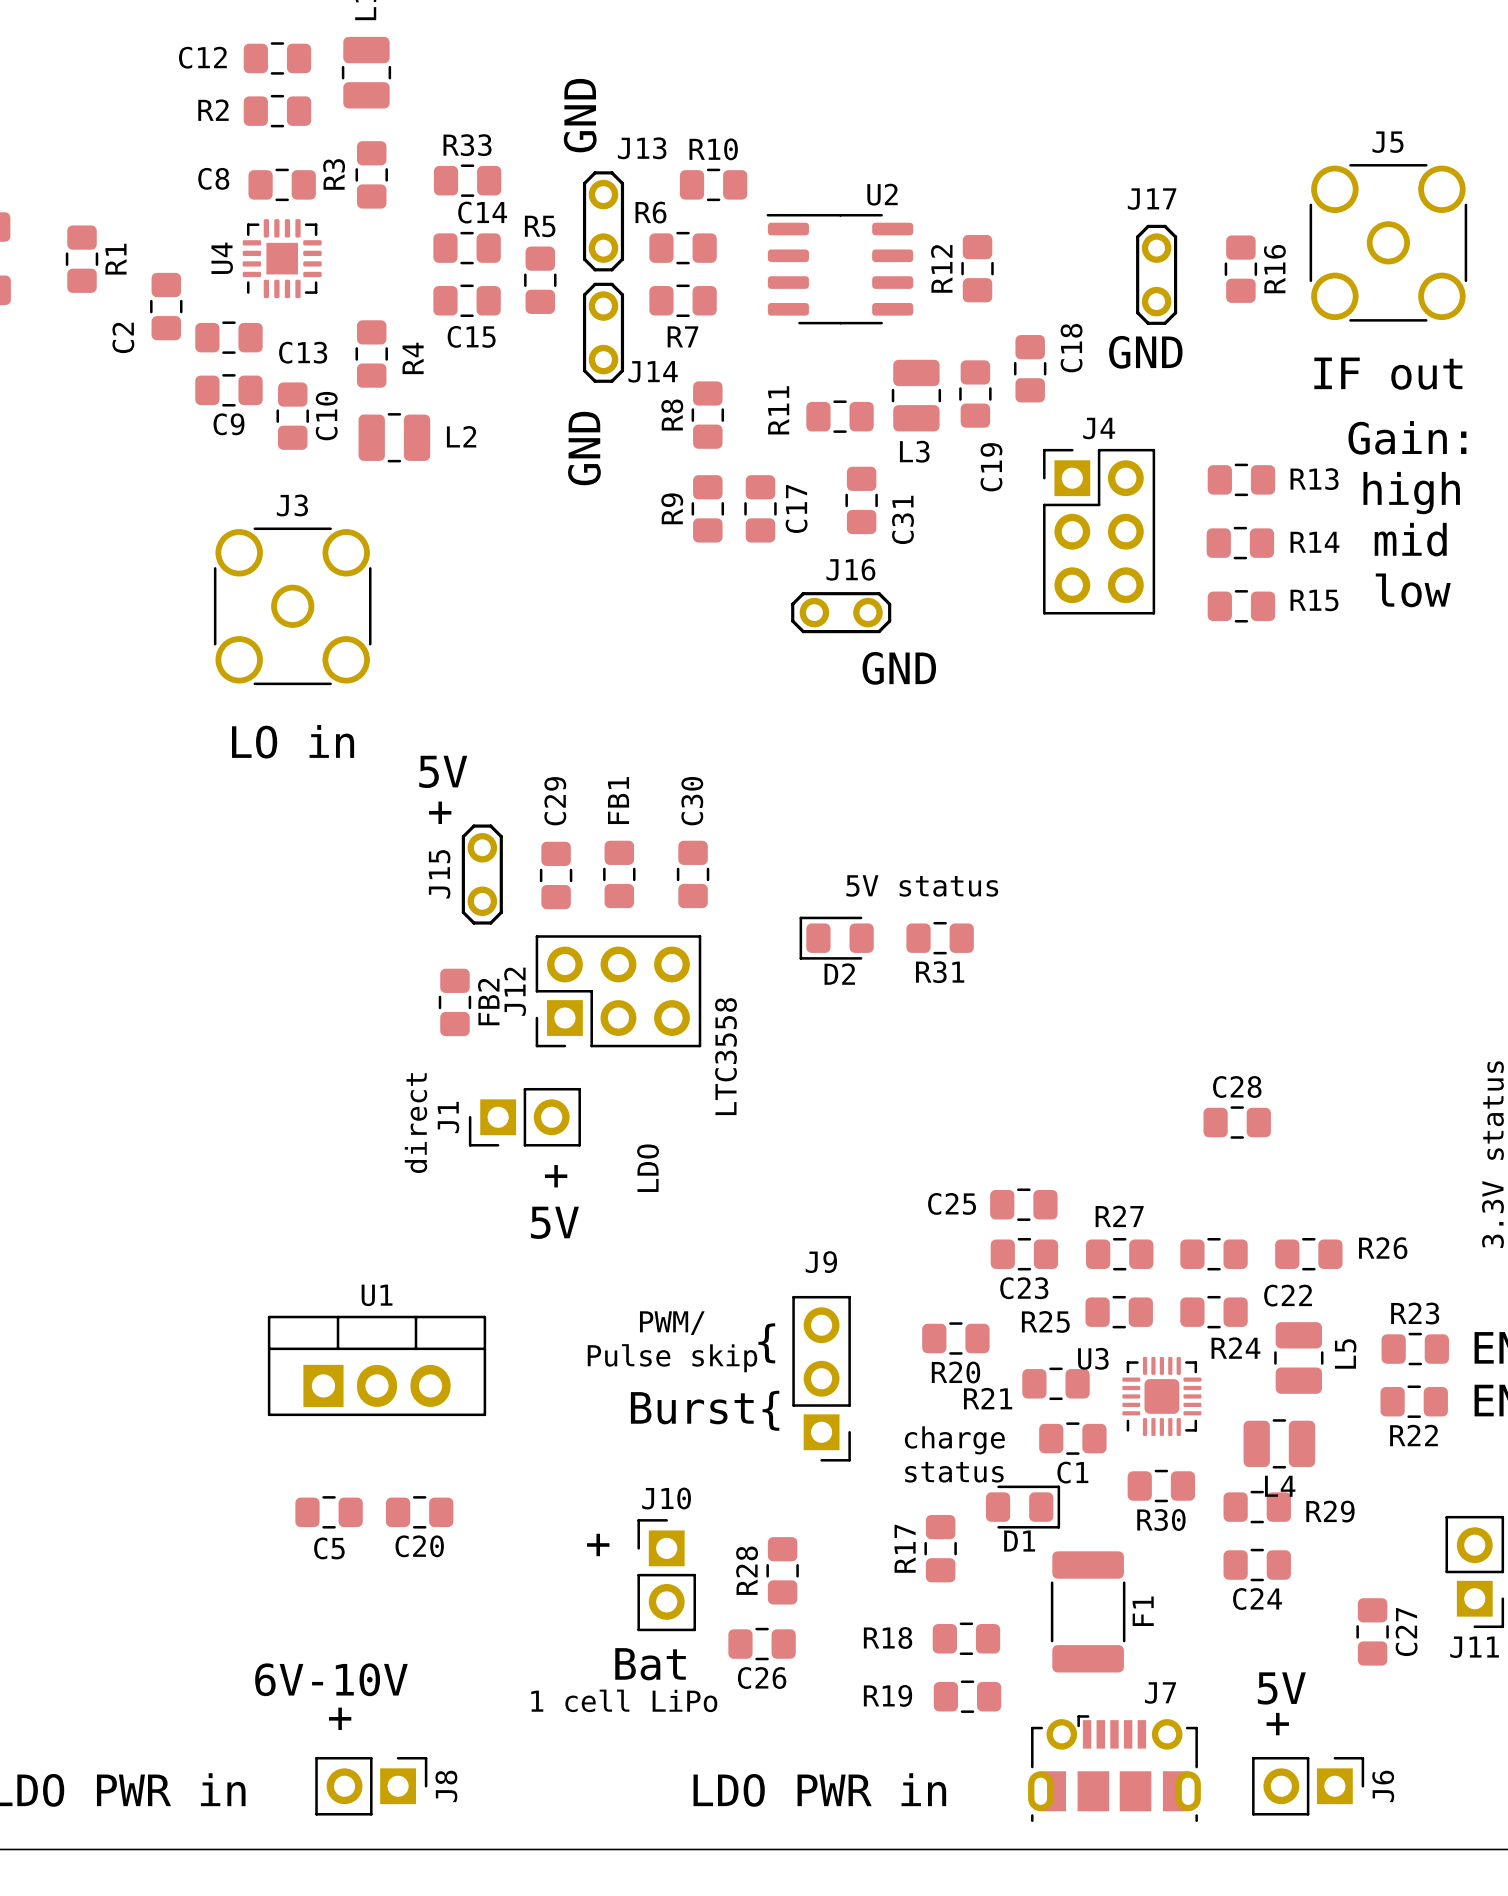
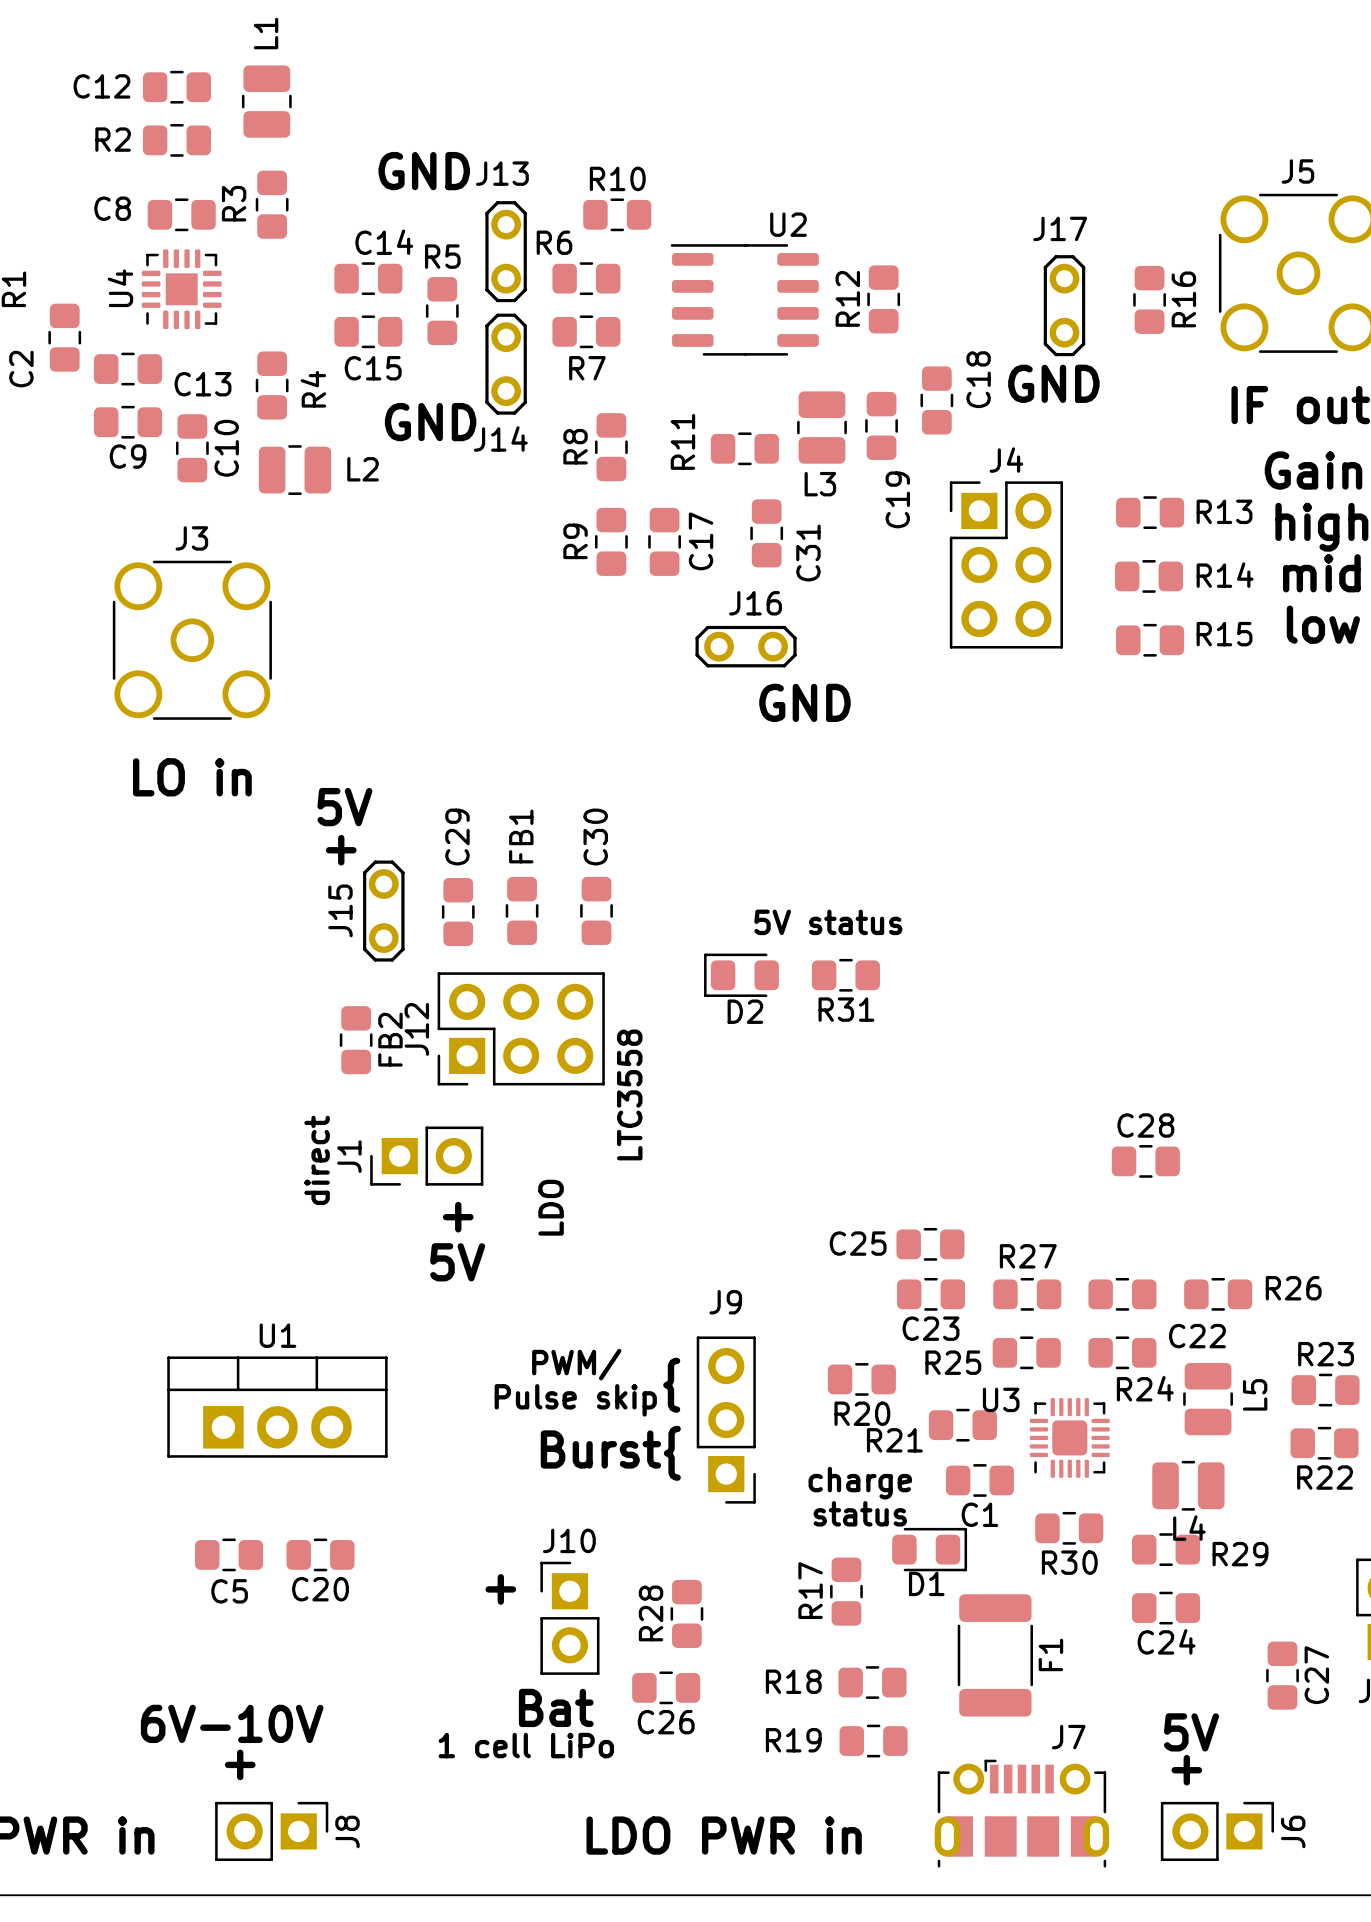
text rotation: 0° (580, 115) -> 90° clockwise (424, 171)
J13 name position: J13 (642, 148) -> J13 (502, 173)
R33: (467, 180) -> none
J14 name position: J14 (653, 371) -> J14 (500, 439)
text rotation: 0° (584, 448) -> 90° clockwise (430, 422)

